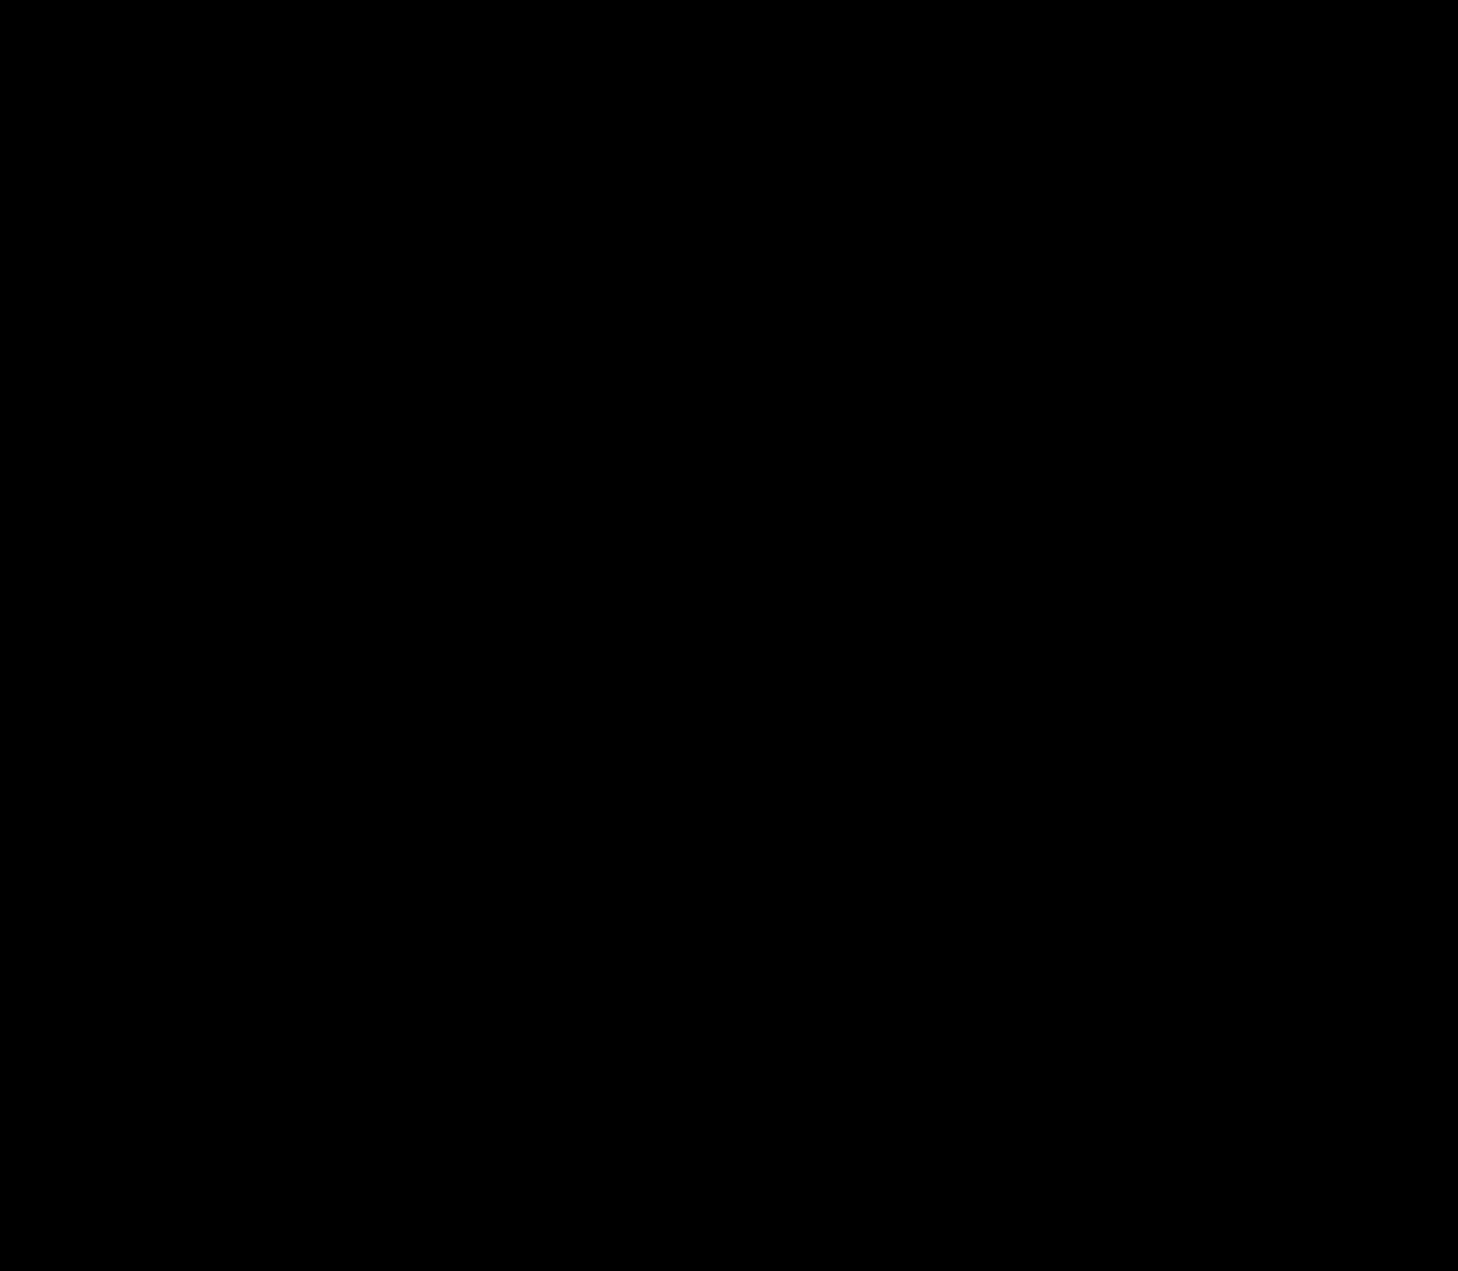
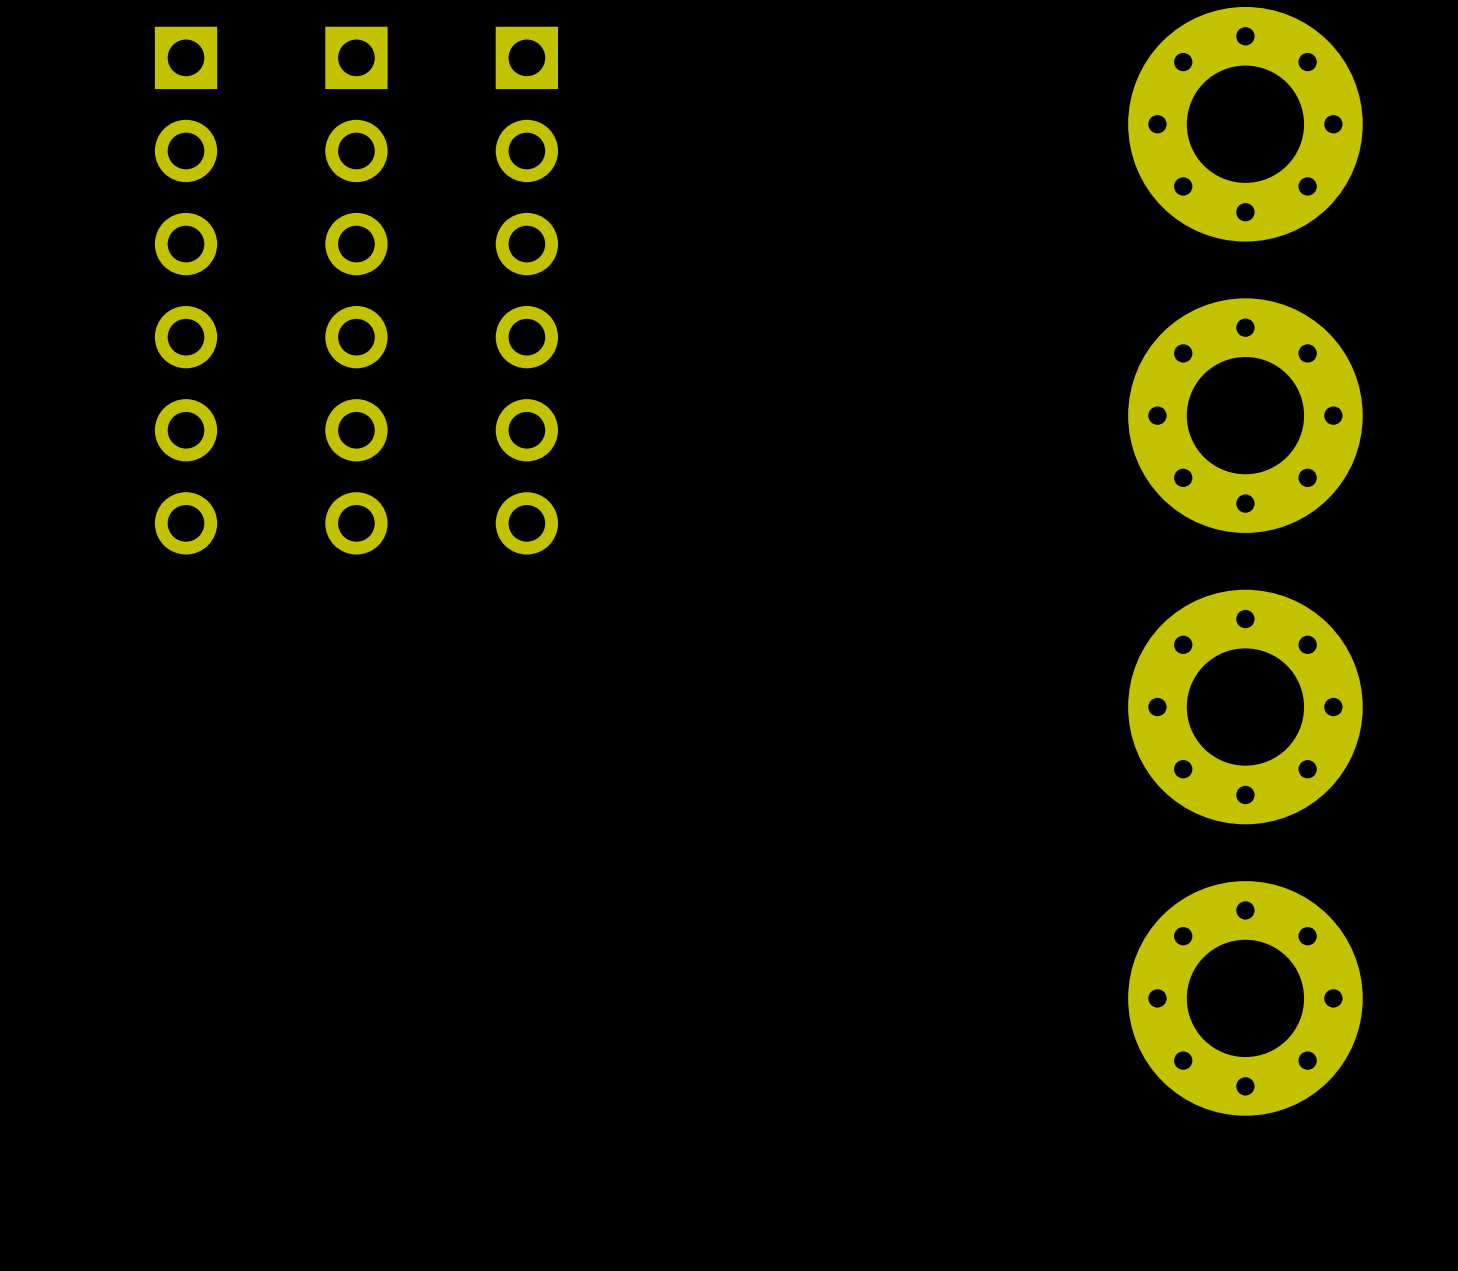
part: none -> (1245, 124)
part: none -> (186, 290)
part: none -> (356, 290)
part: none -> (526, 290)
part: none -> (1245, 415)
part: none -> (1245, 707)
part: none -> (1245, 998)

